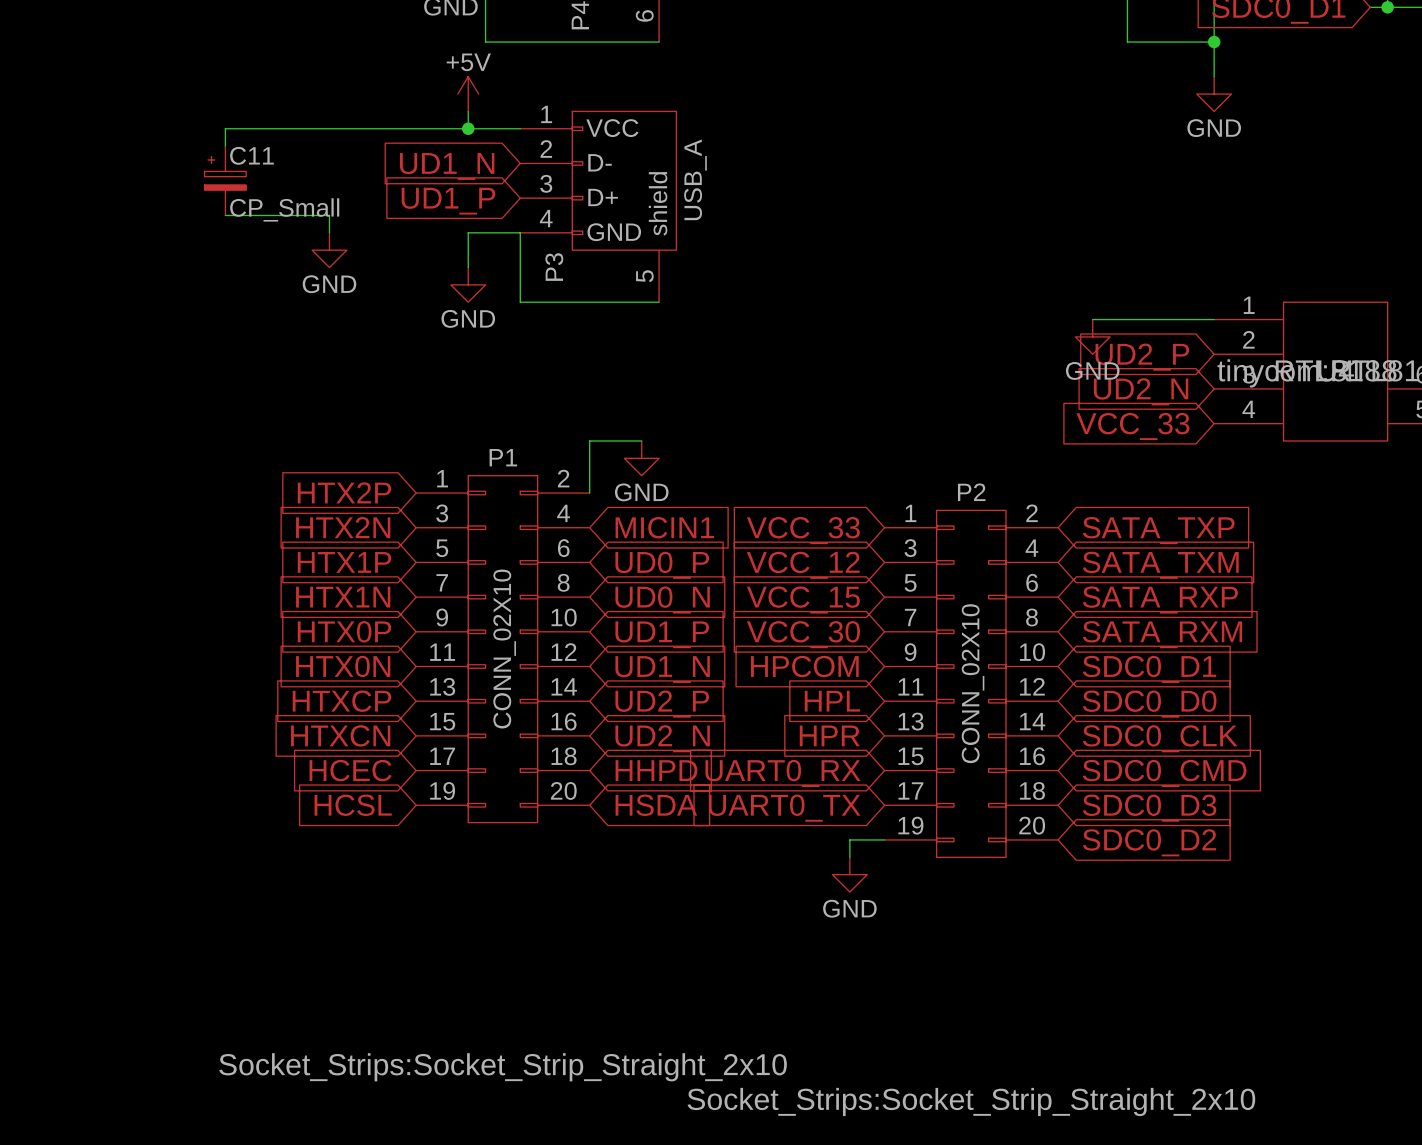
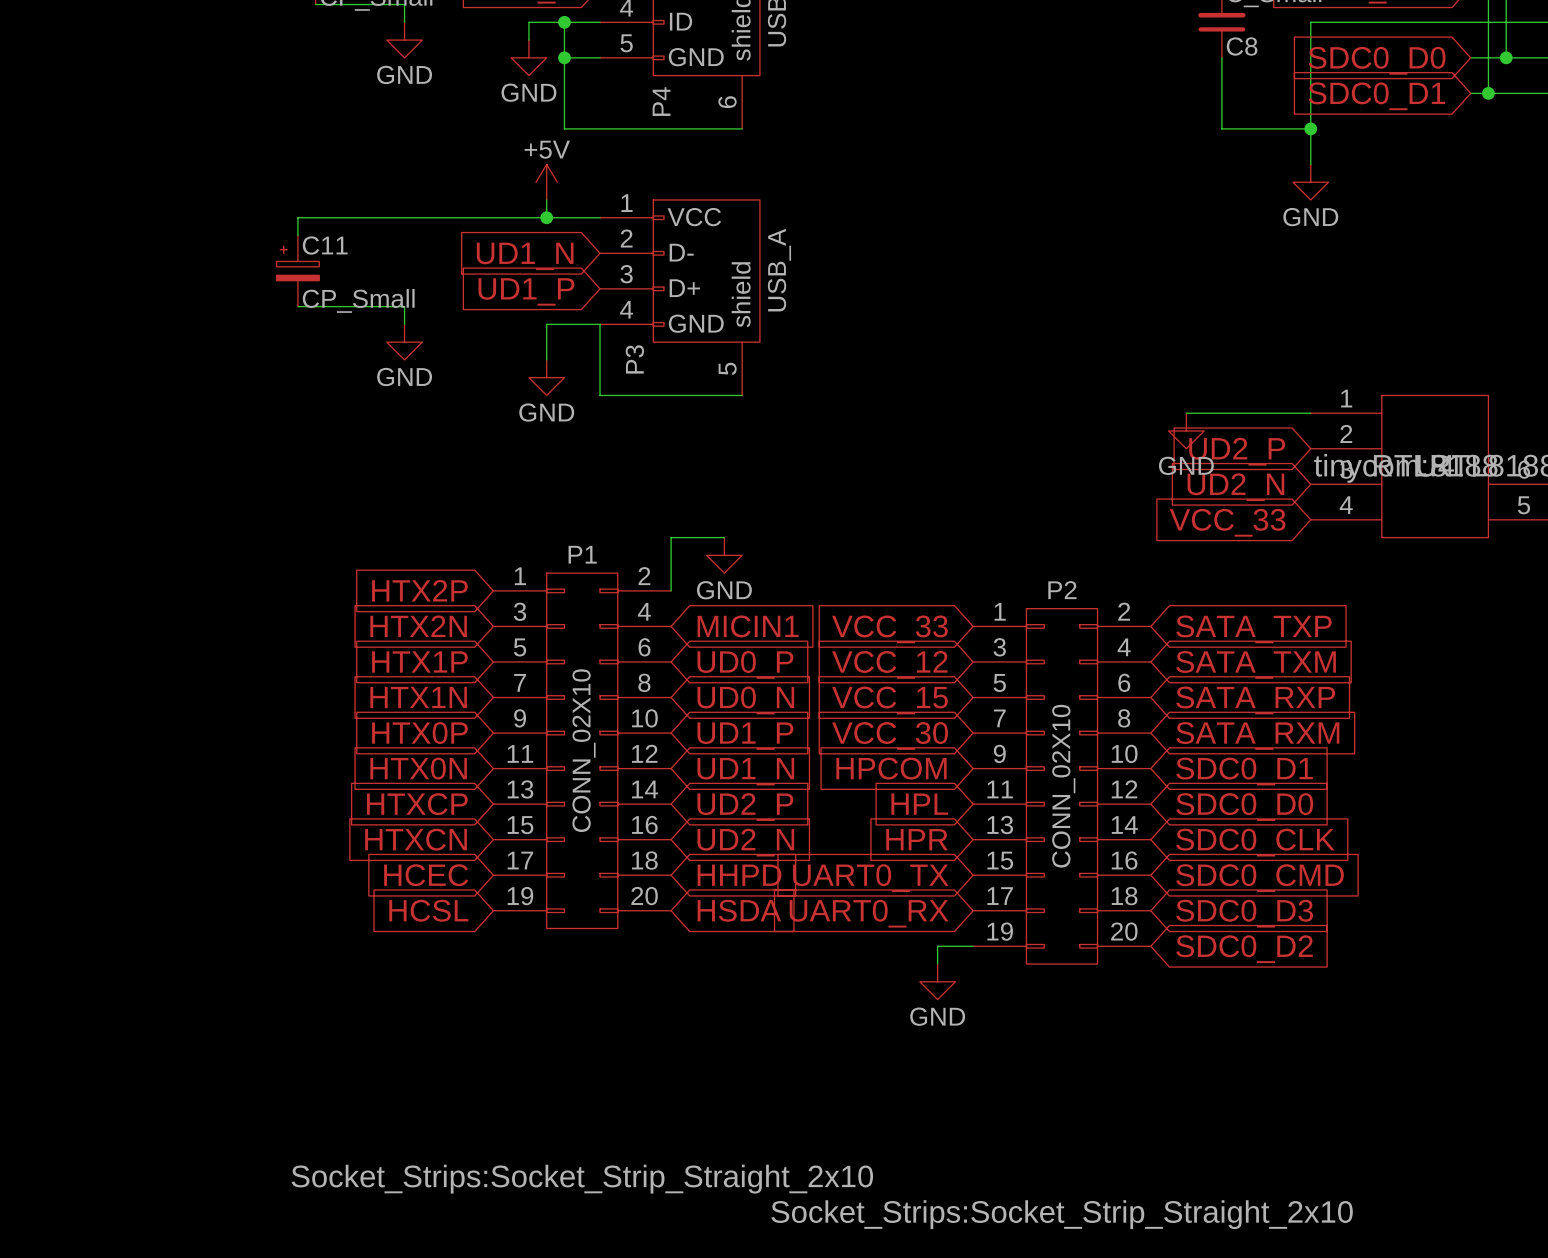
global label: UART0_RX (782, 773) -> UART0_TX (870, 878)
global label: UART0_TX (784, 808) -> UART0_RX (869, 913)

